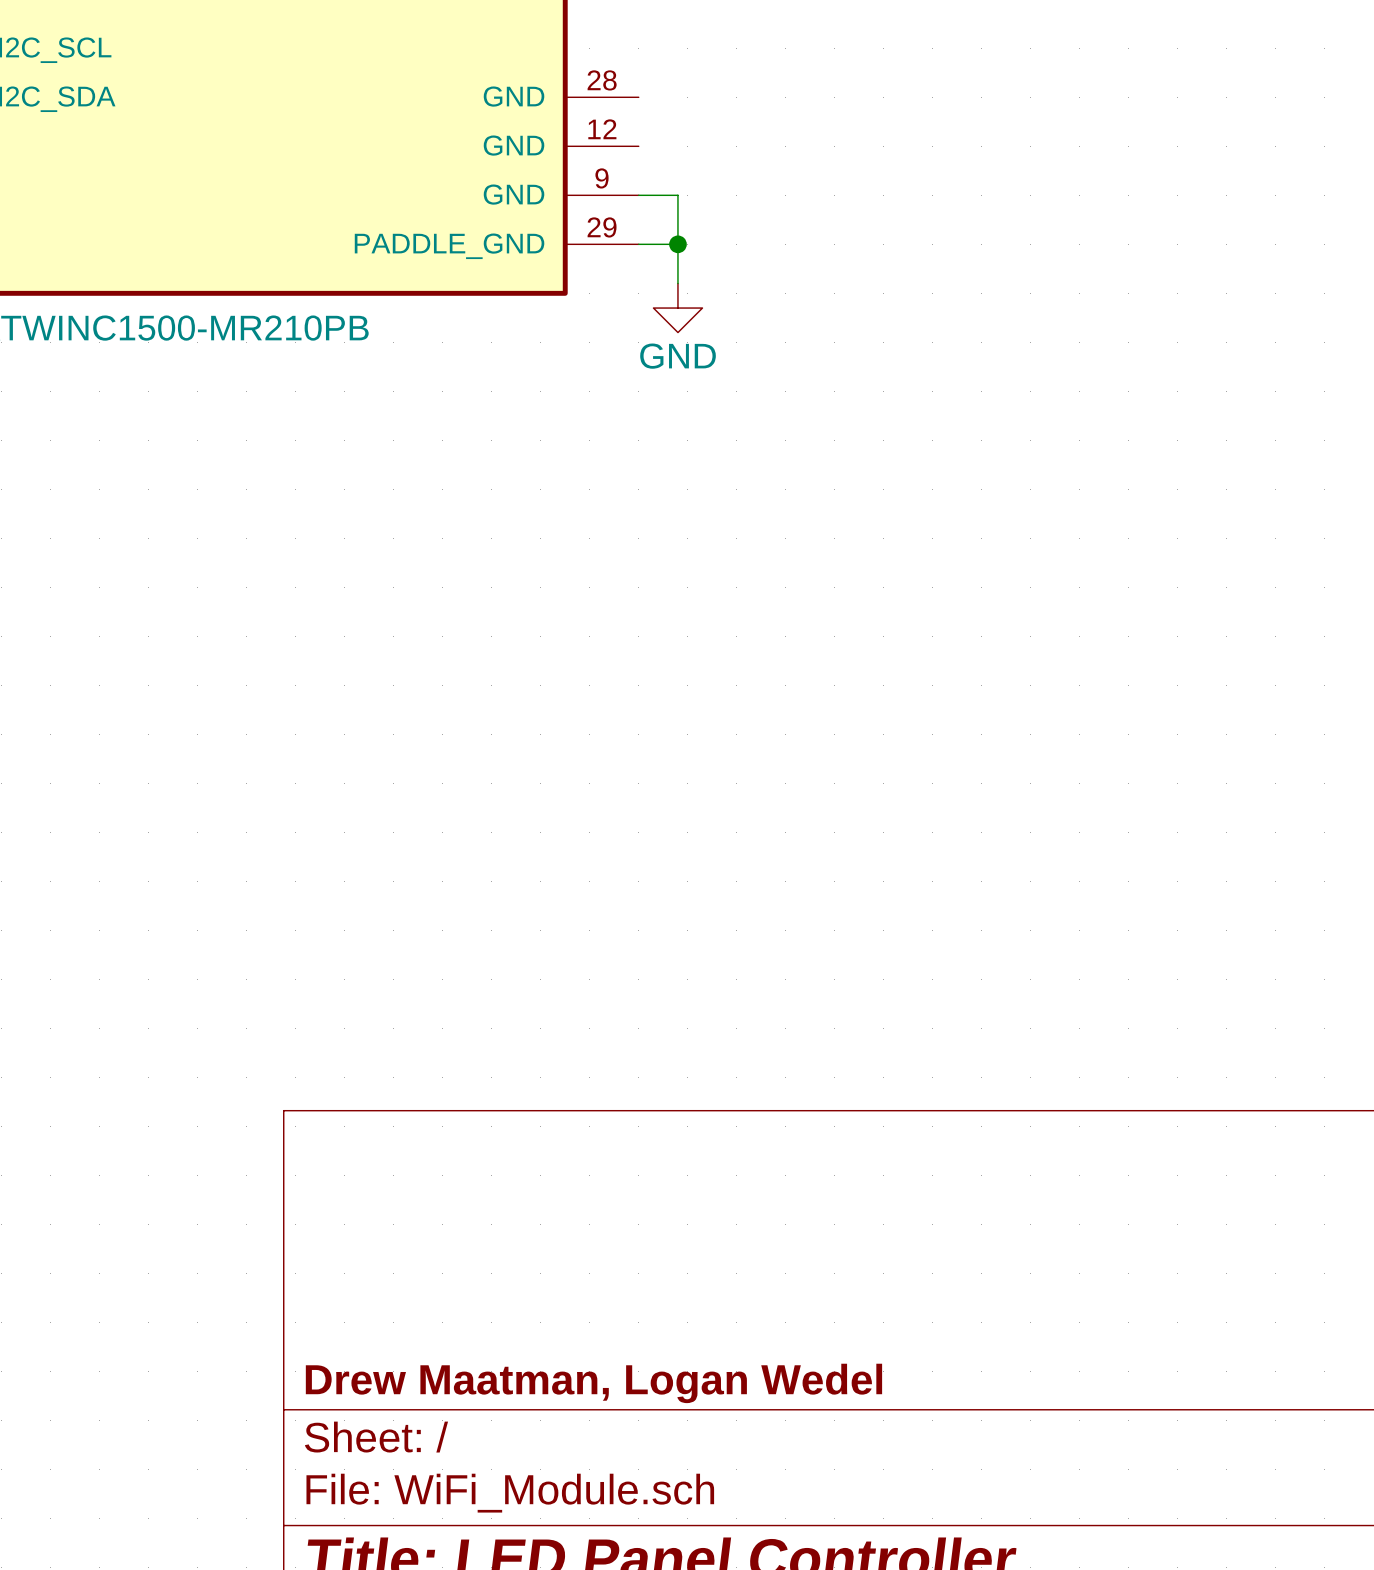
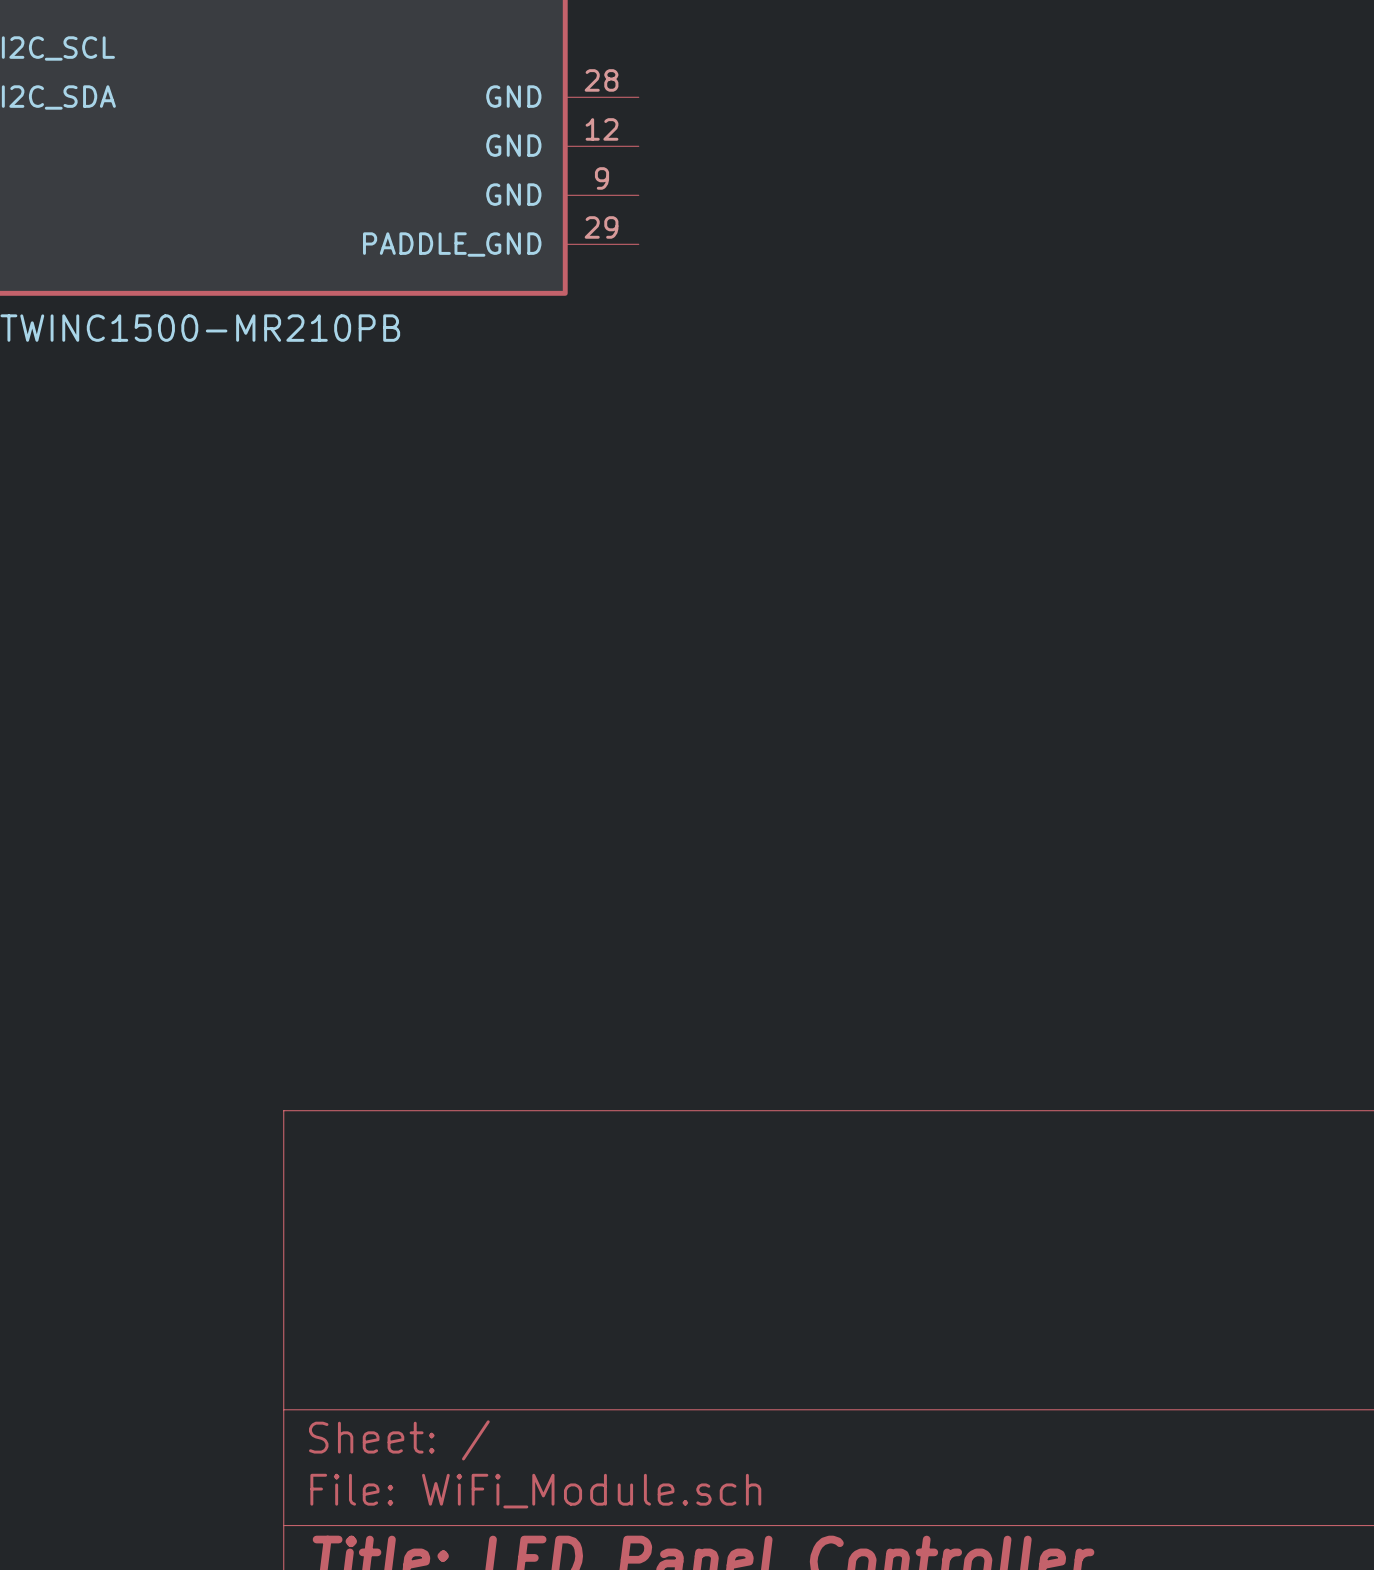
wire: (638, 195) (677, 195) (677, 283) -> none
wire: (638, 244) (677, 244) -> none
junction: (677, 244) -> none
power symbol: GND (677, 308) -> none
title block: Drew Maatman, Logan Wedel (593, 1383) -> none

